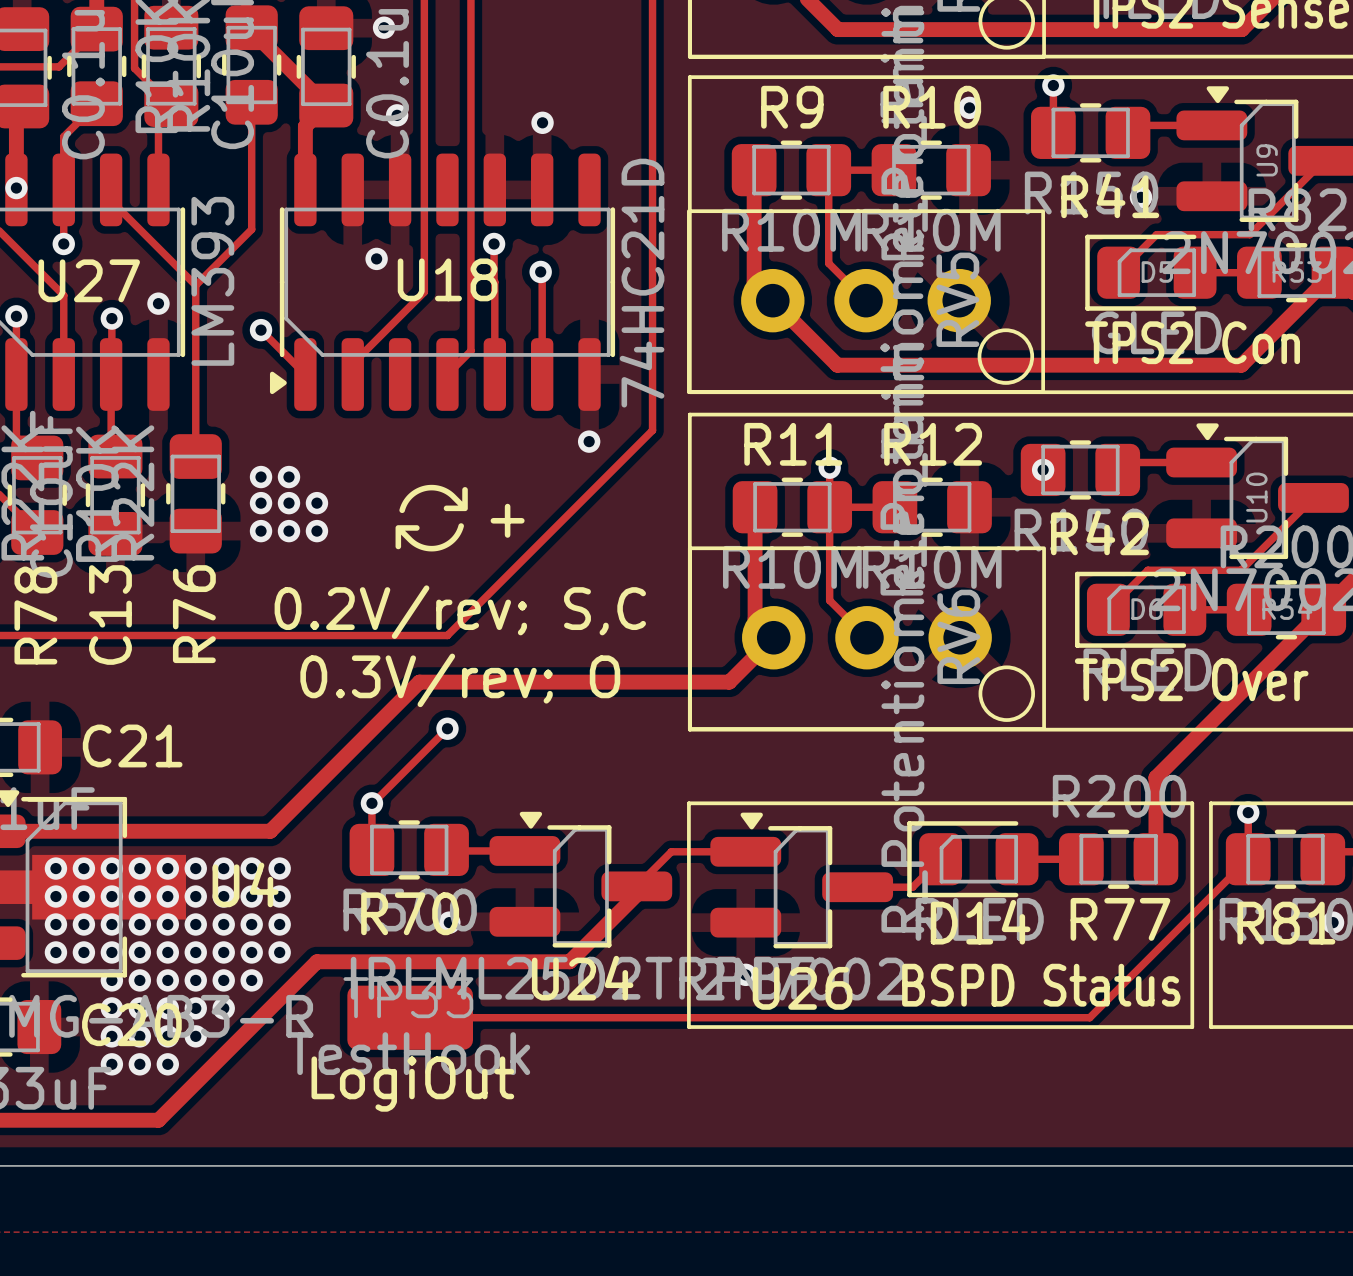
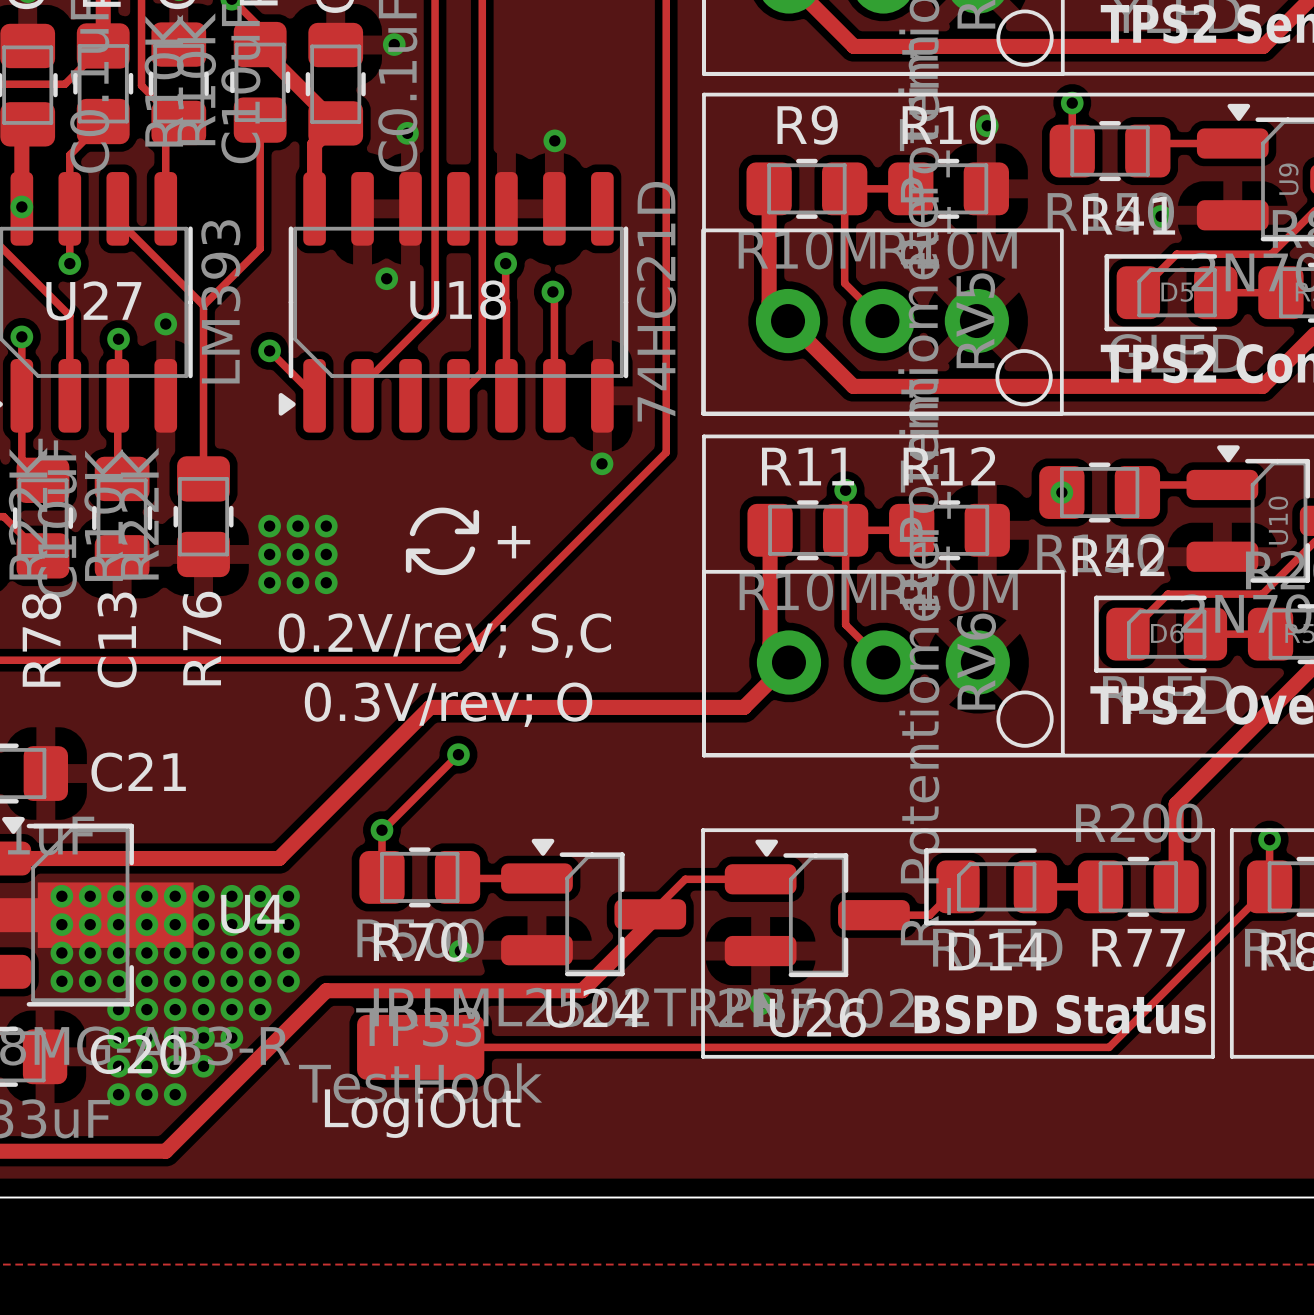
via: (261, 477) -> none
via: (288, 477) -> none
via: none -> (269, 582)
via: none -> (297, 582)
via: none -> (326, 582)

